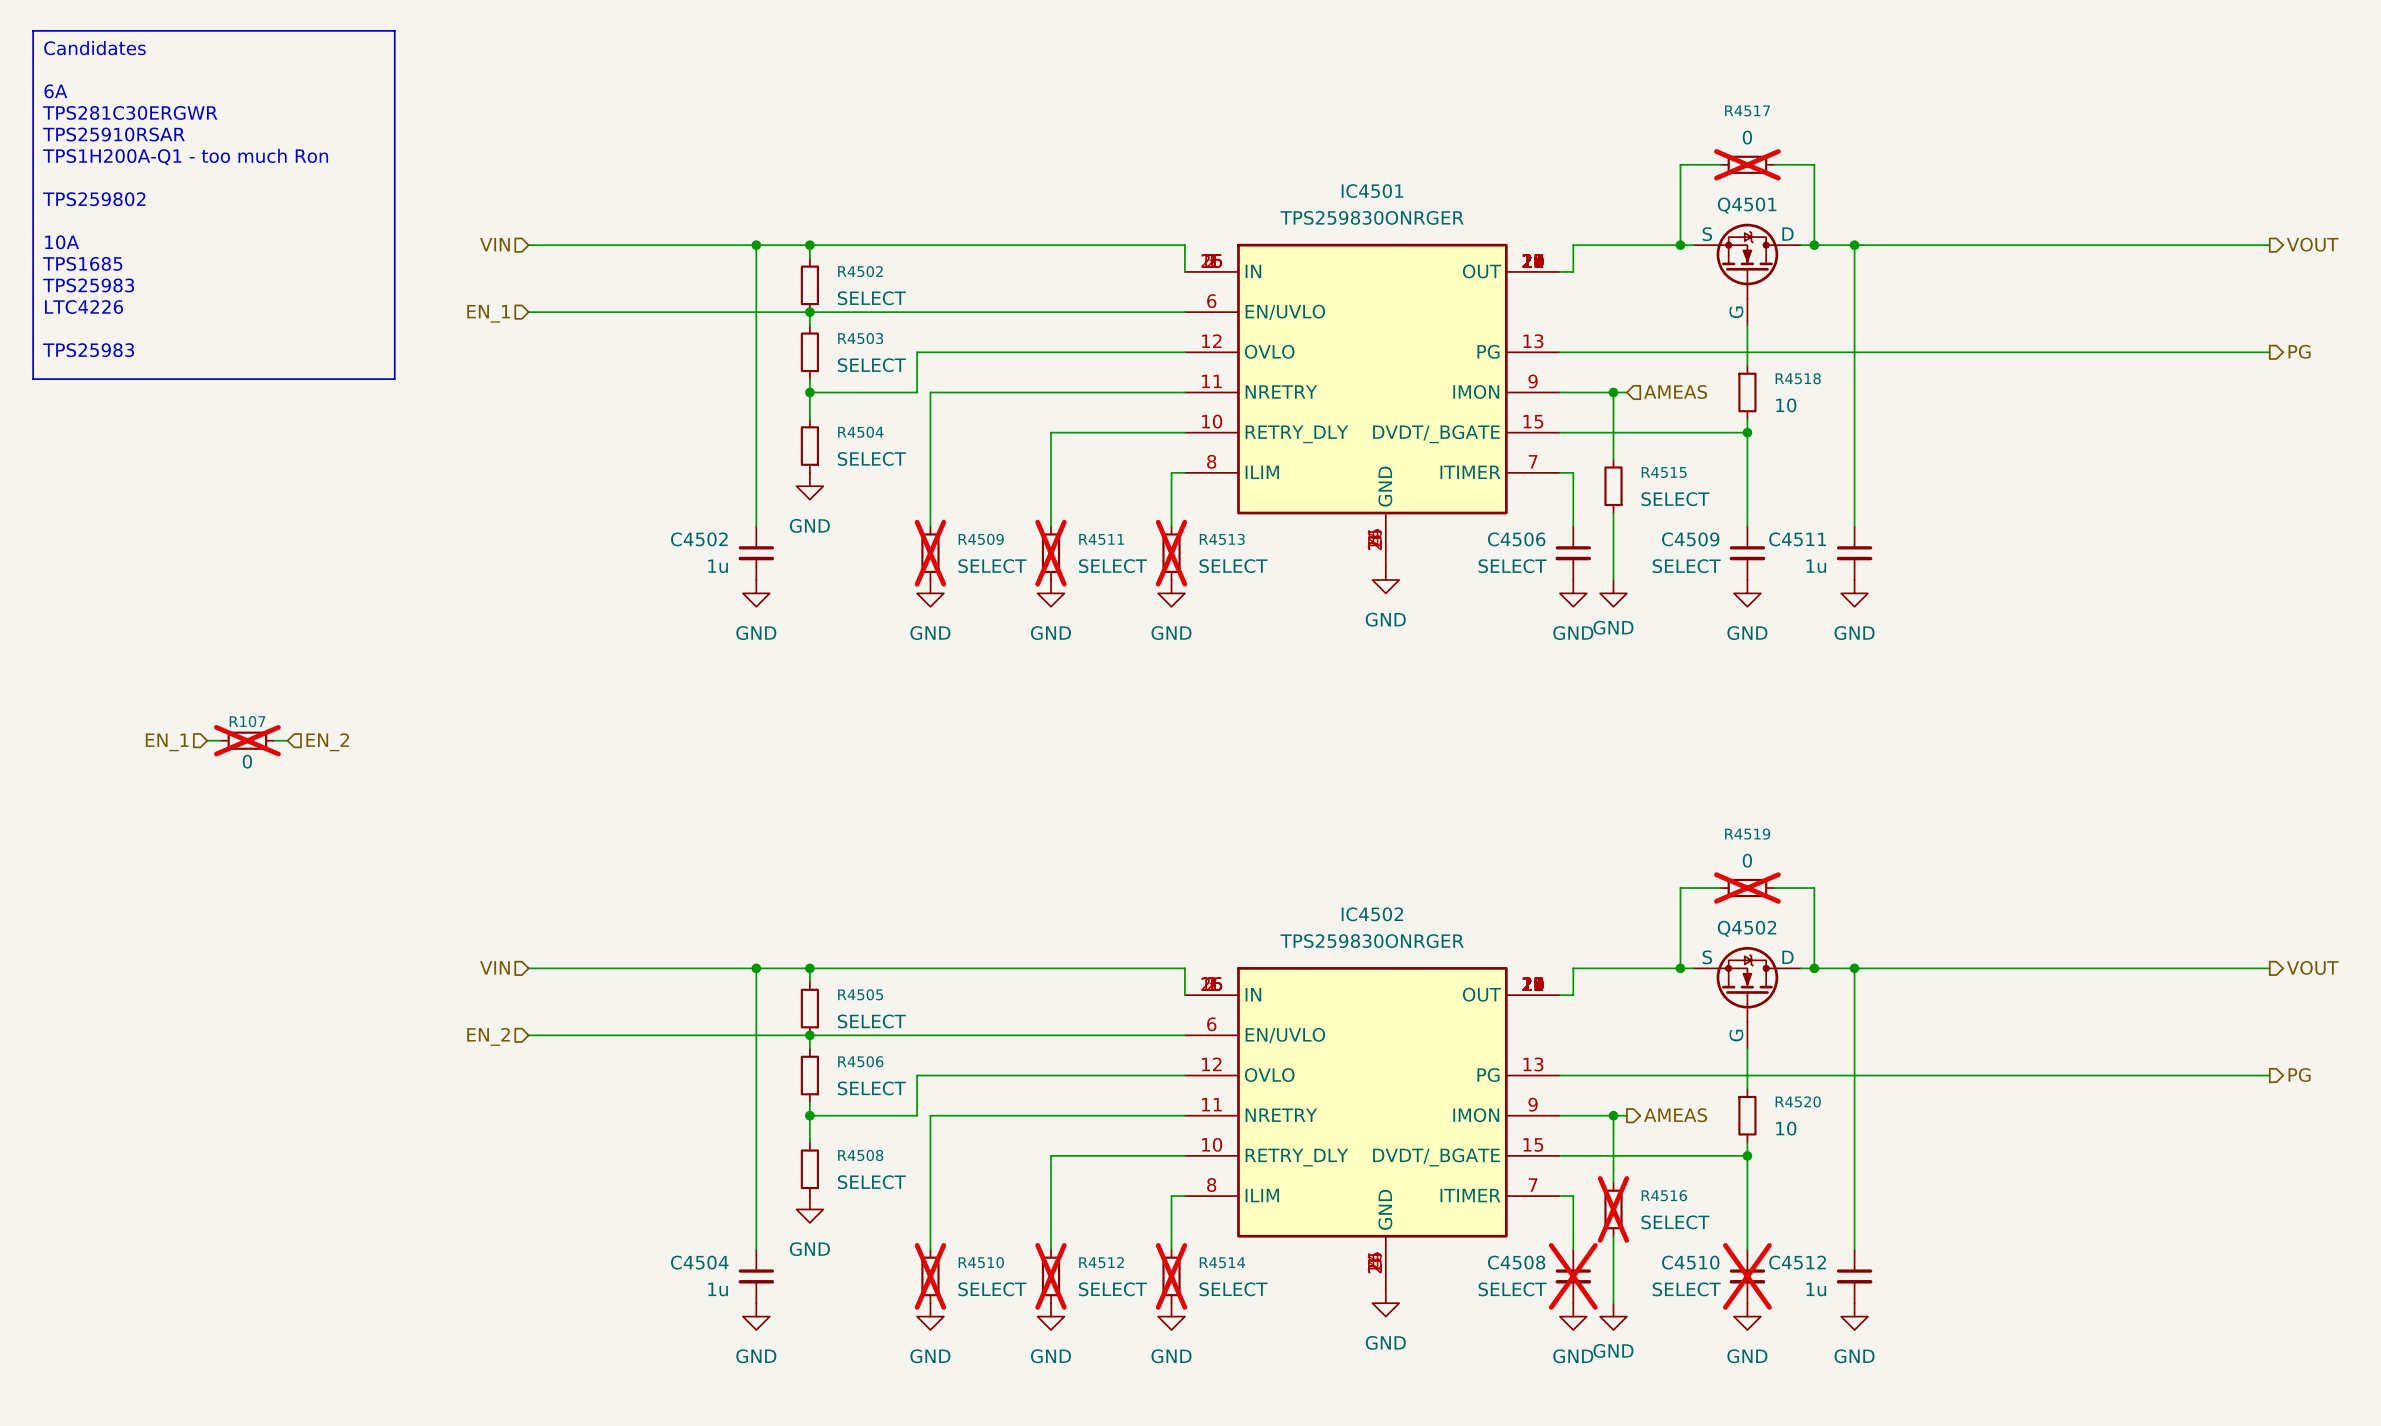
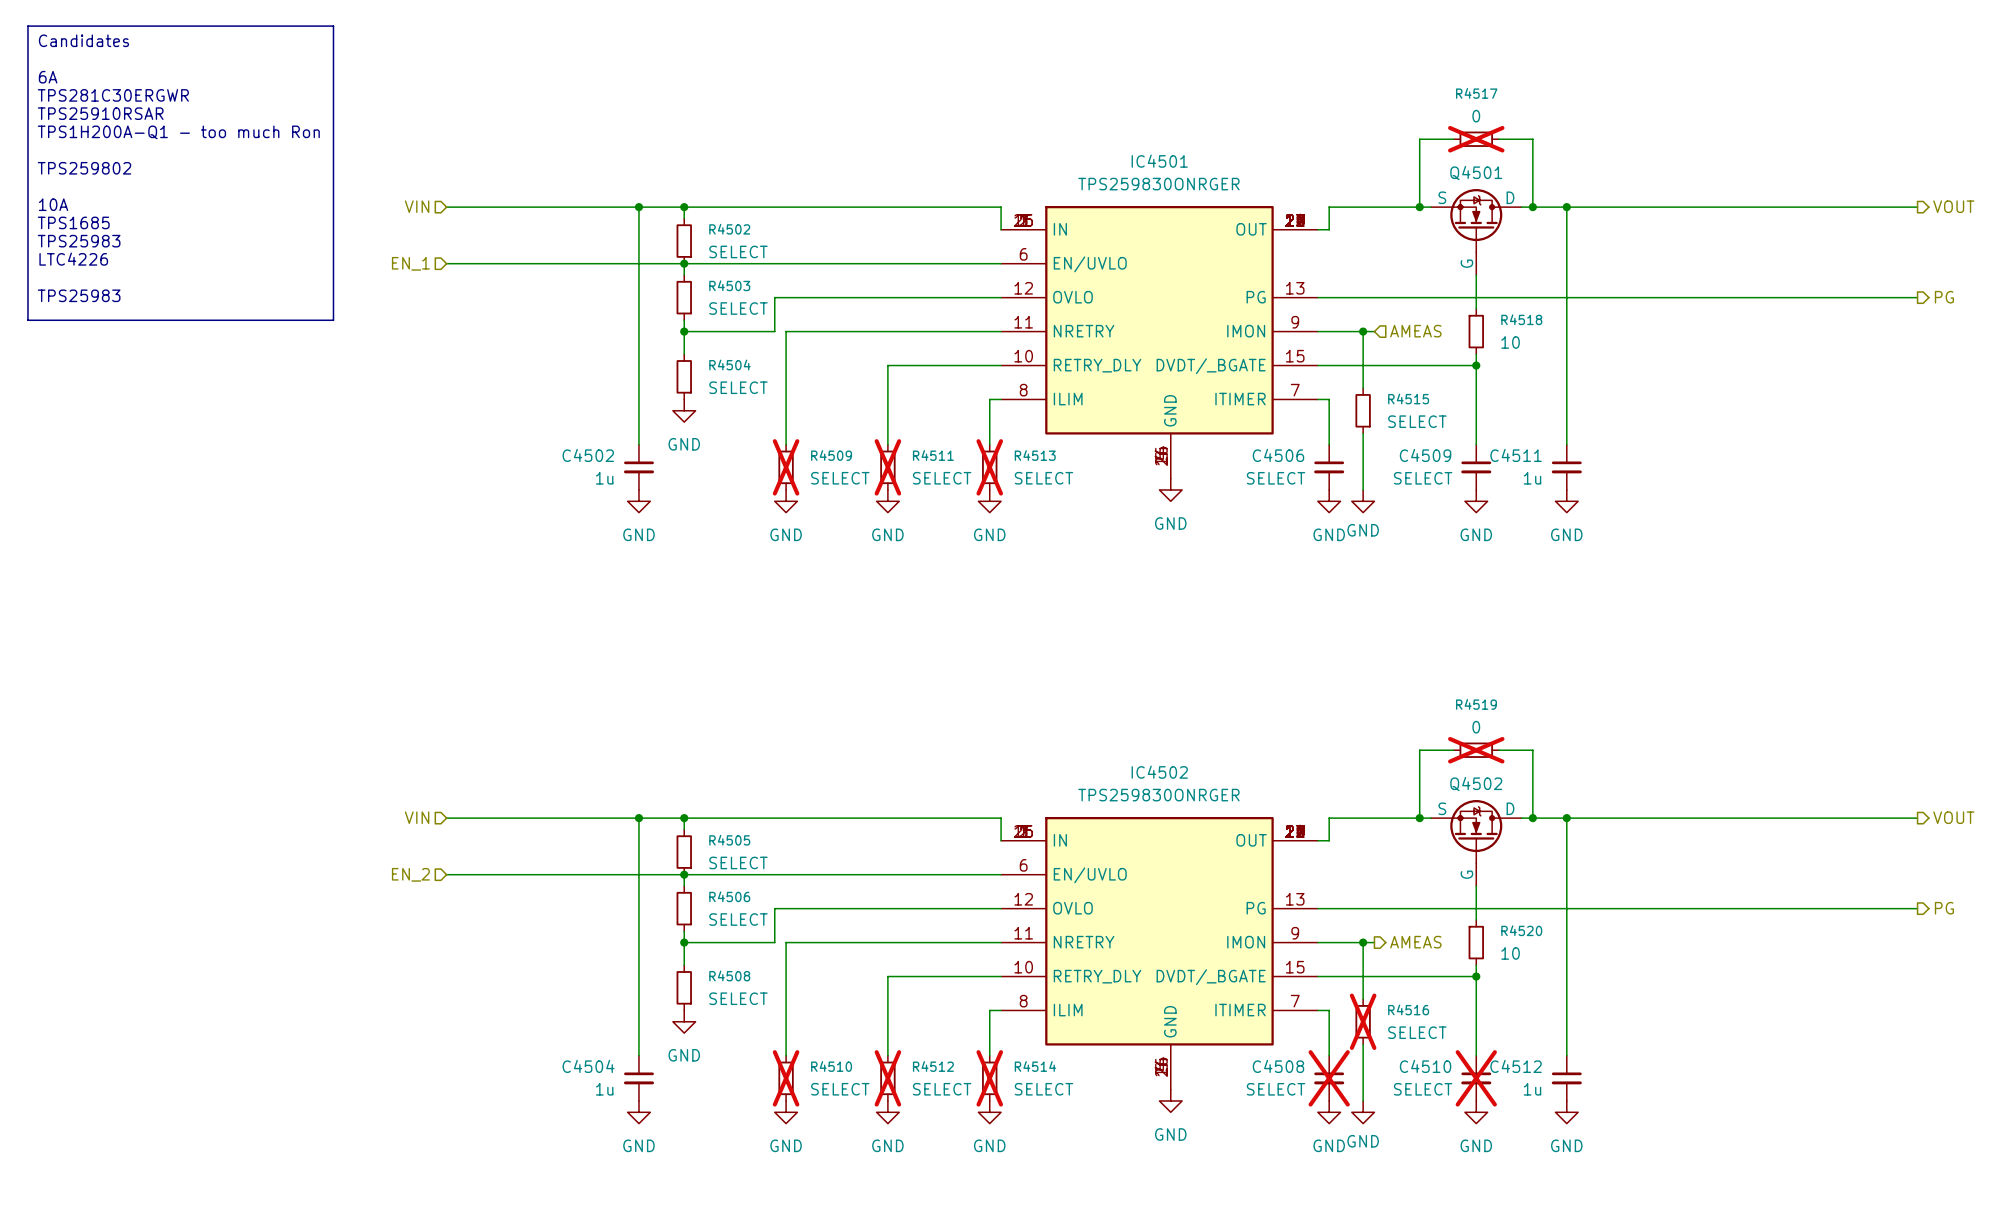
wire: (207, 740) (220, 740) -> none
R107: 0 (247, 740) -> none
wire: (274, 740) (287, 740) -> none
hierarchical label: EN_1 (167, 742) -> none
hierarchical label: EN_2 (327, 742) -> none

